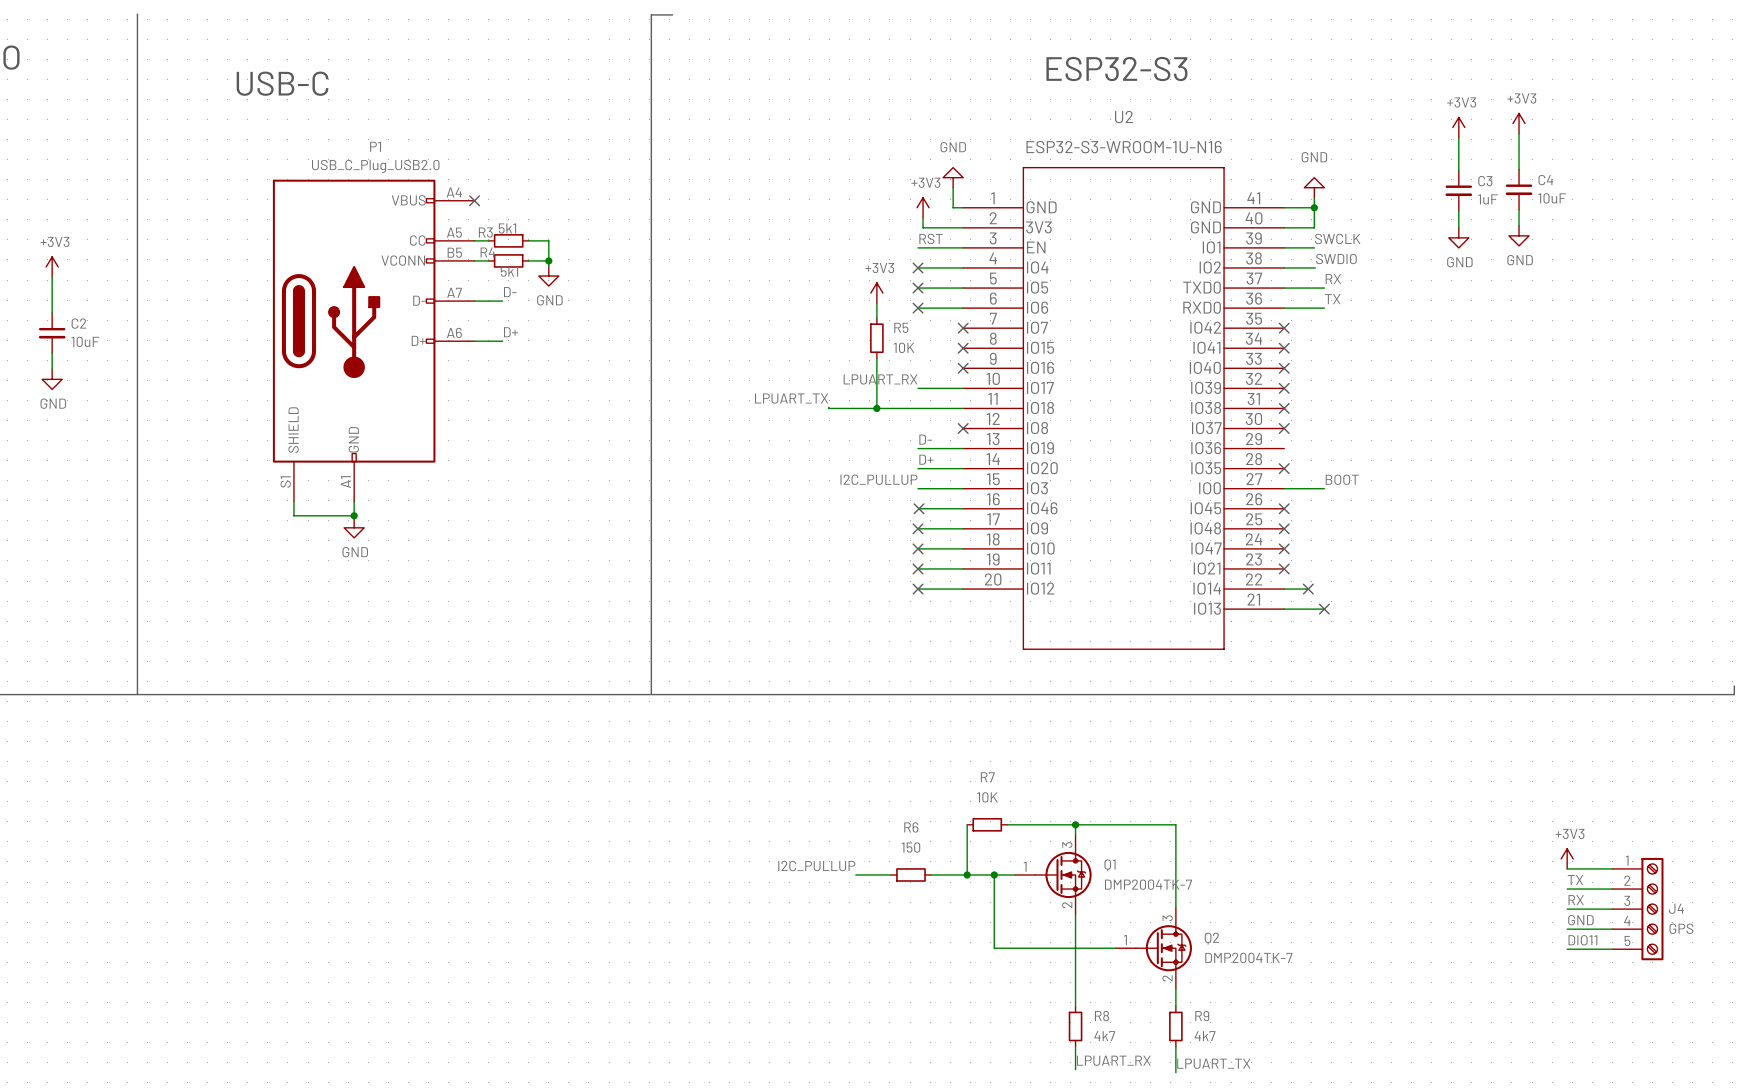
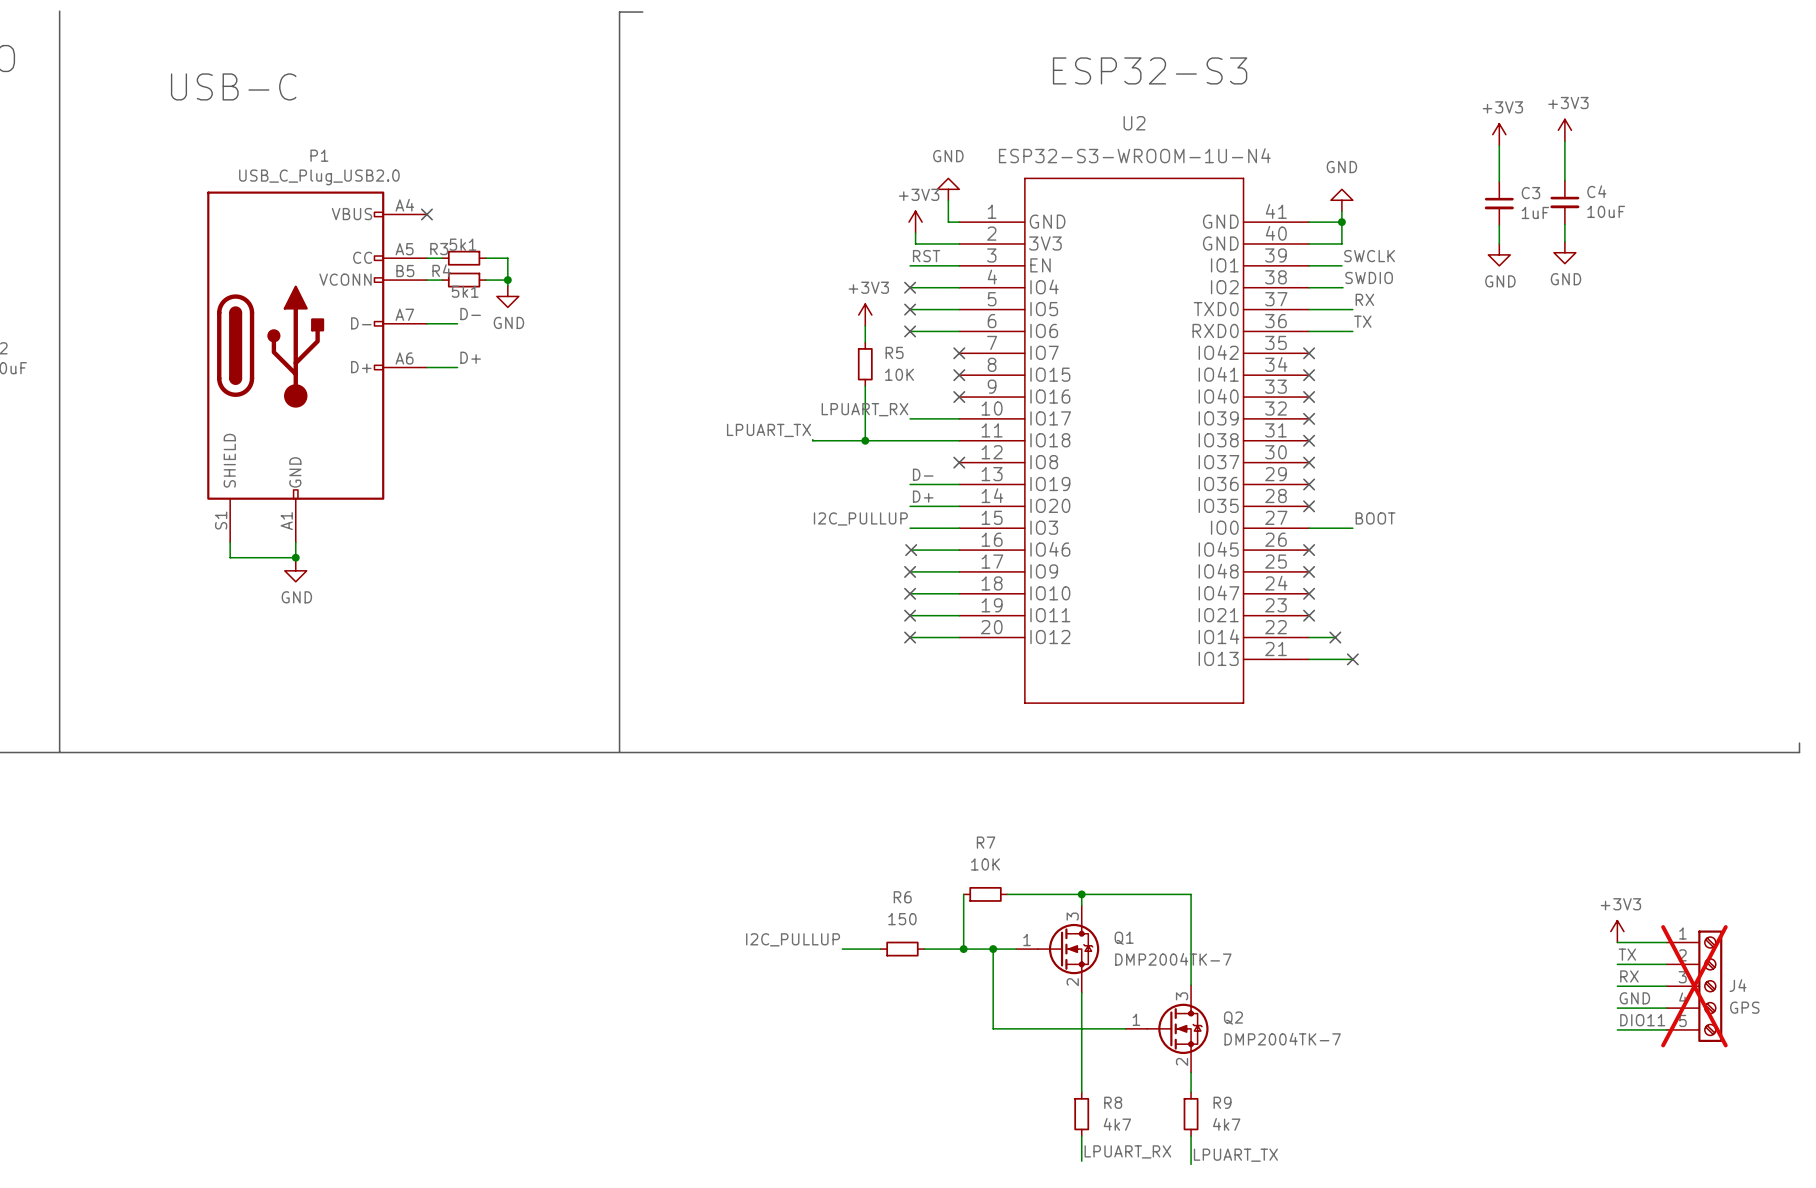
U2 value: ESP32-S3-WROOM-1U-N16 (1124, 147) -> ESP32-S3-WROOM-1U-N4 (1134, 155)
no-connect mark: none -> (1309, 484)
J4 do-not-place cross: none -> (1694, 986)

